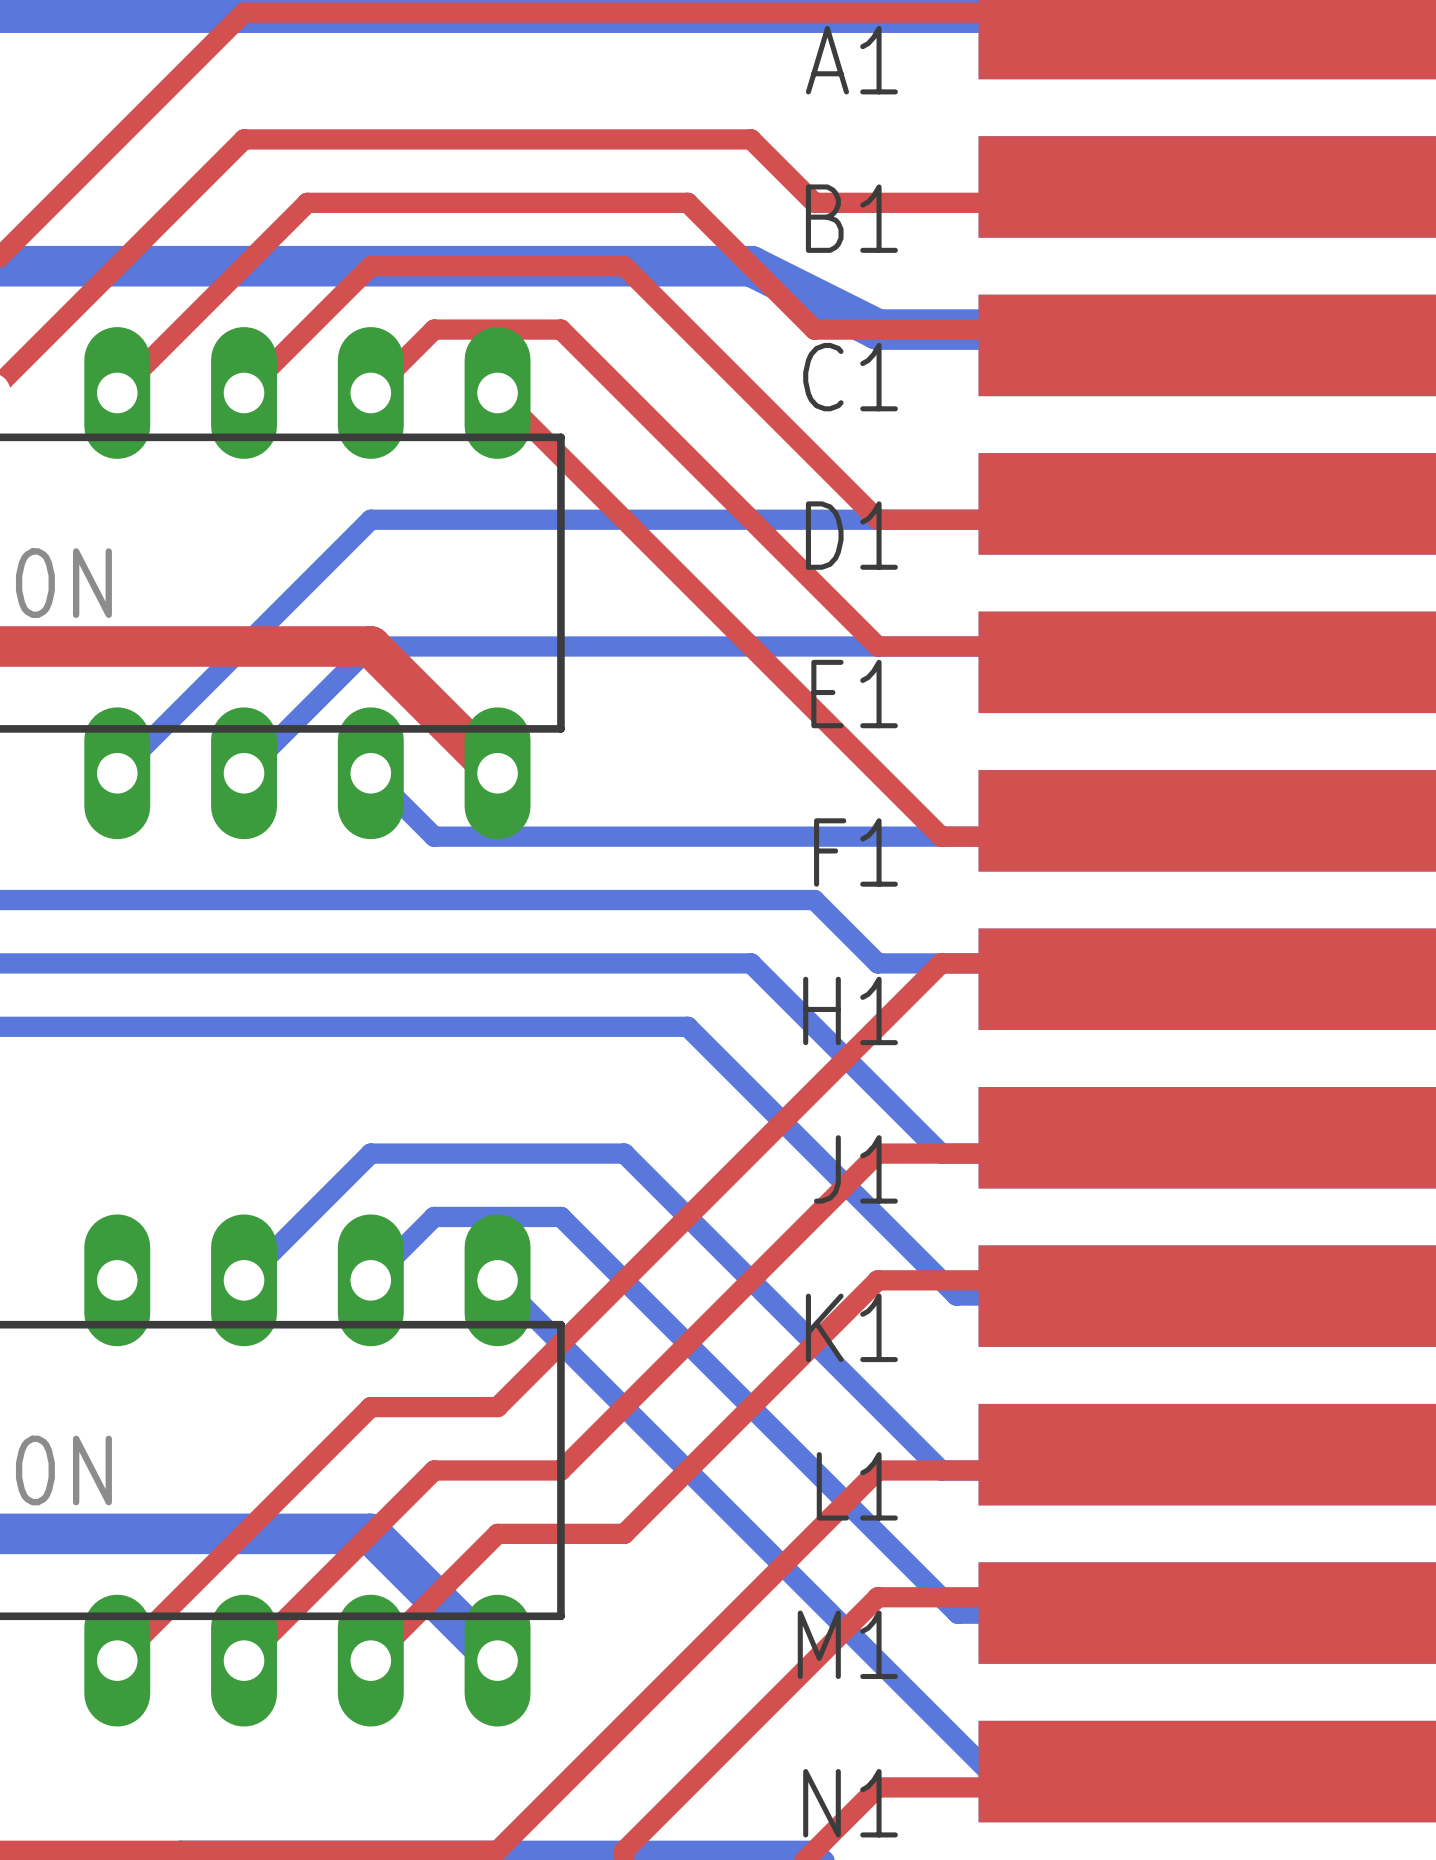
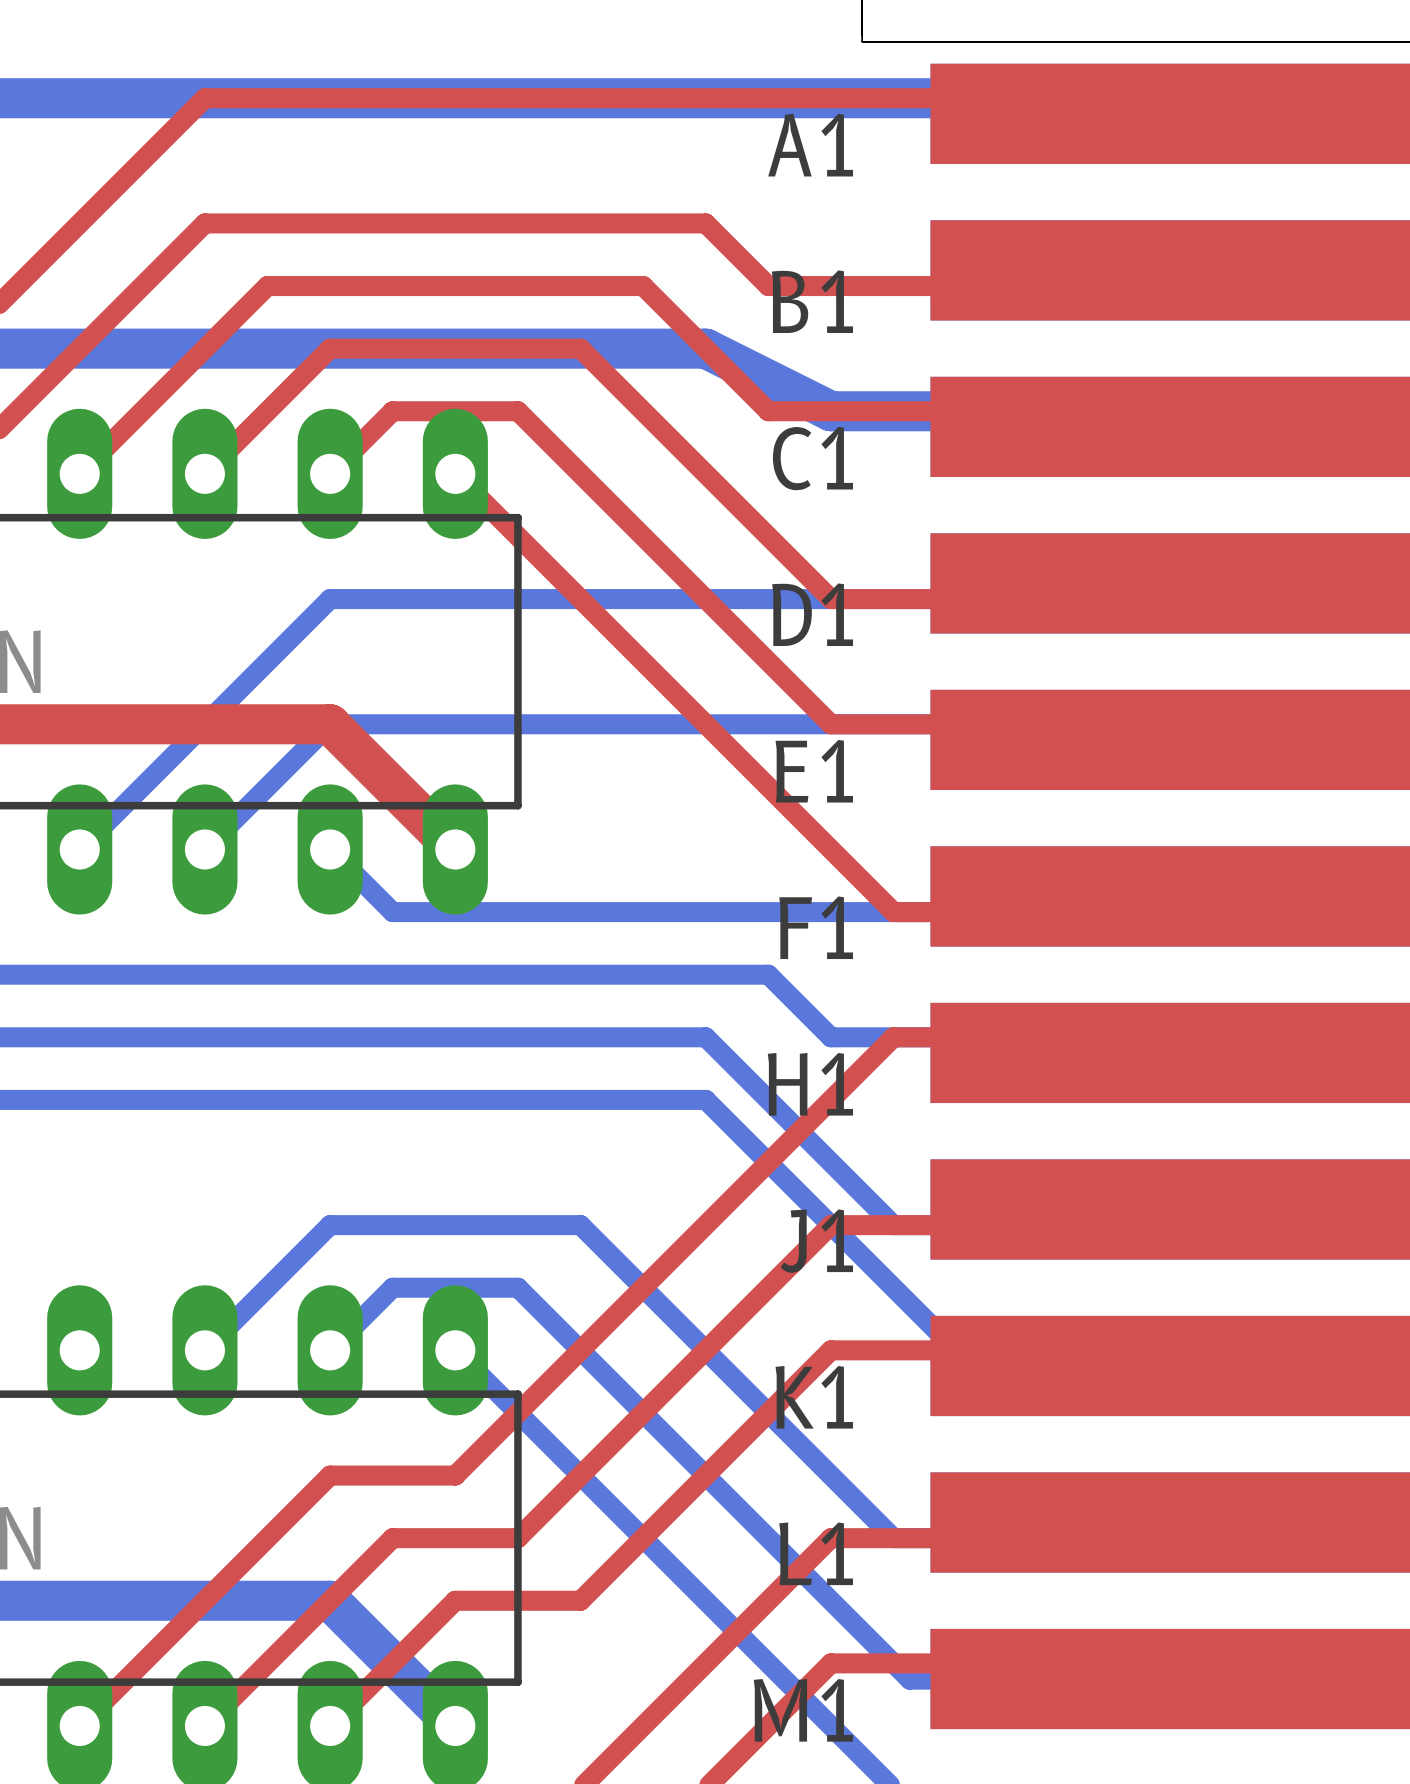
bottom track: (687, 1026) (956, 1295) (1305, 1296) -> (643, 1099) (705, 1099) (971, 1365) (1253, 1365)

